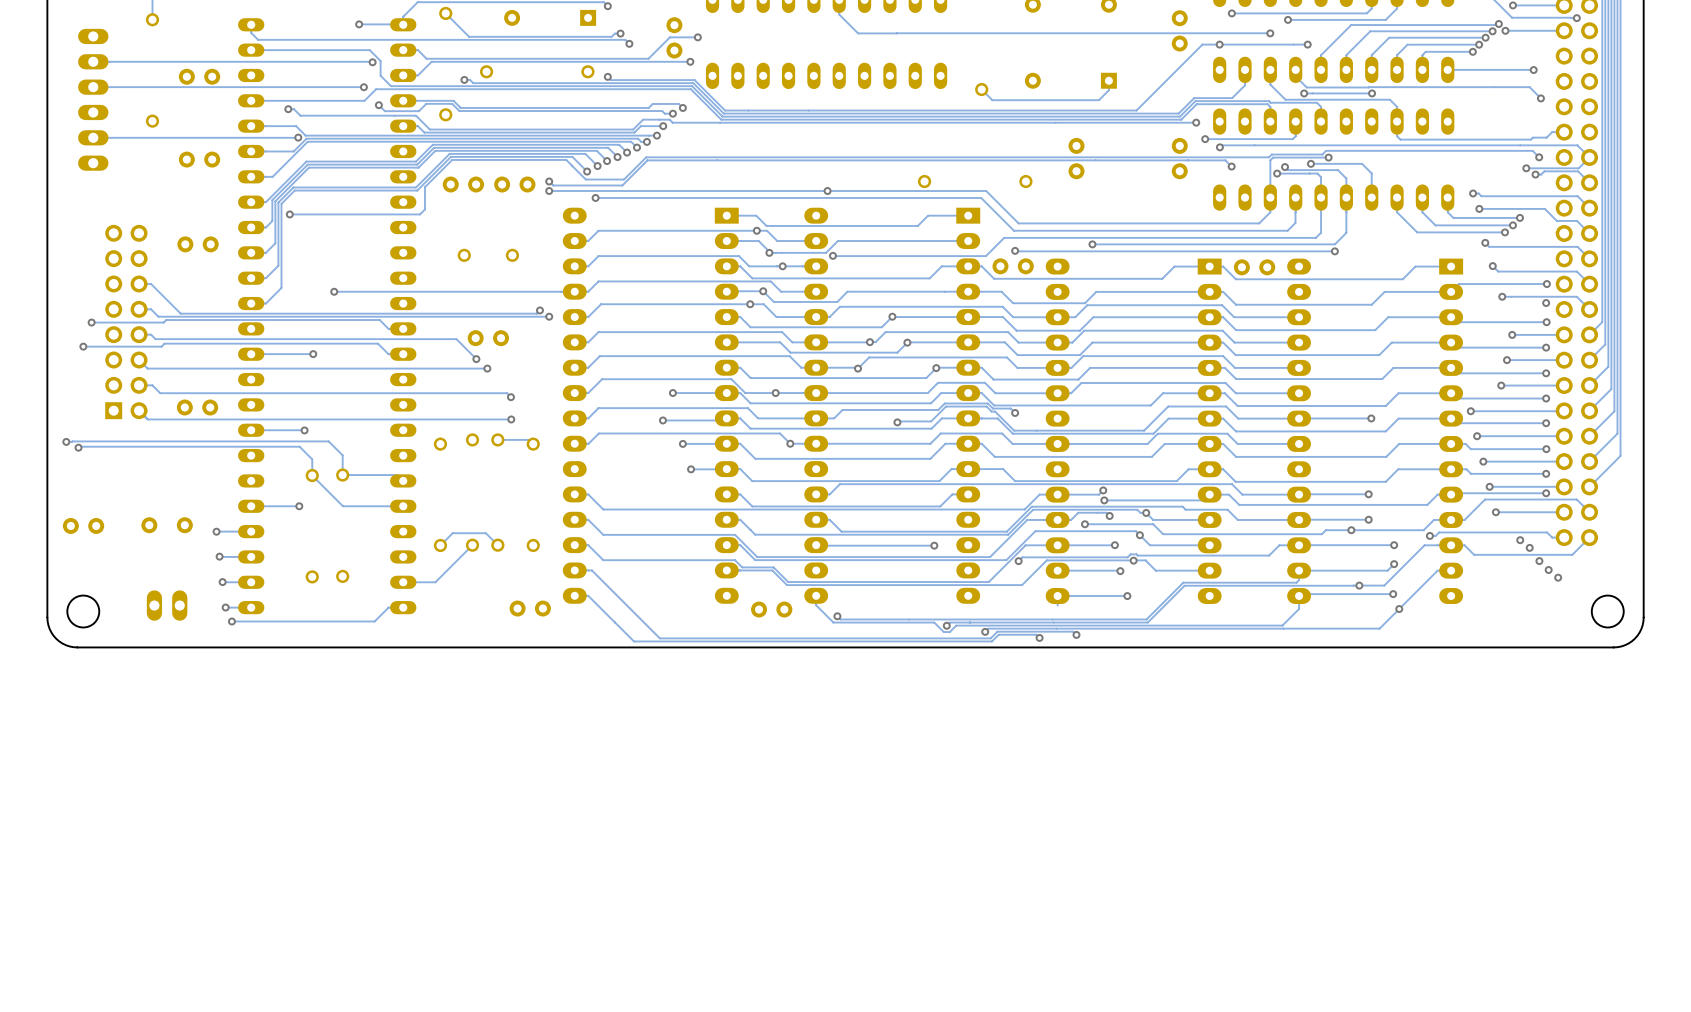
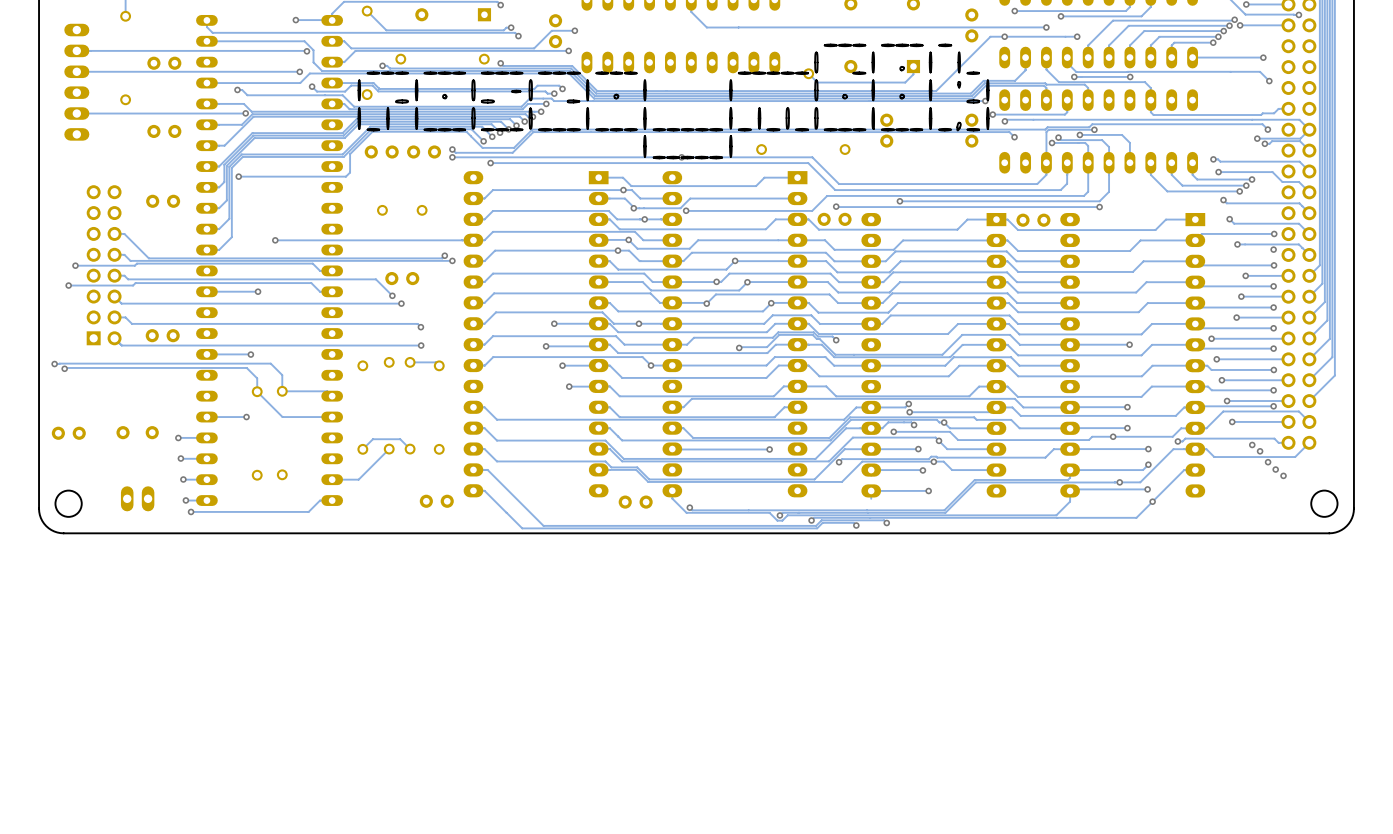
drawing: none -> [358, 44, 989, 159]

